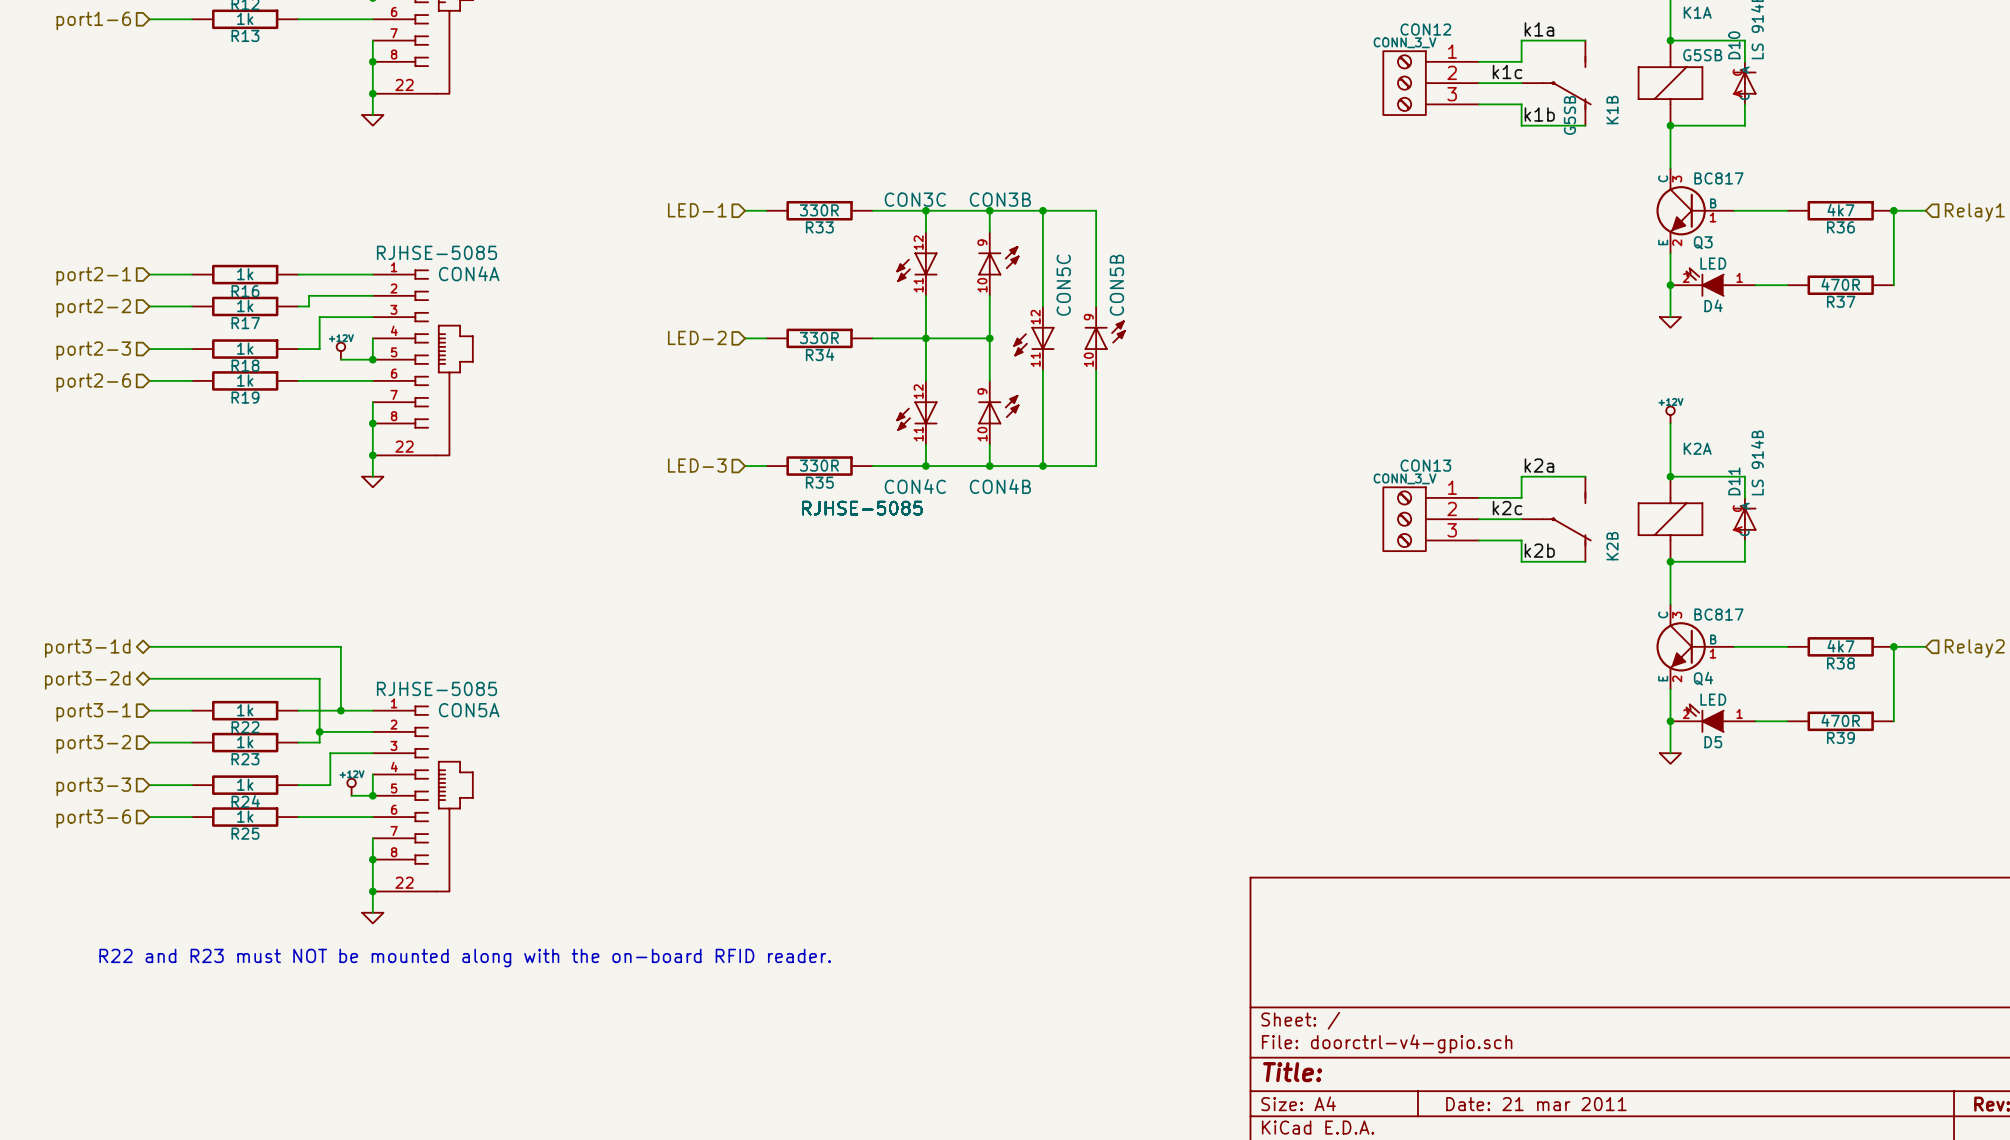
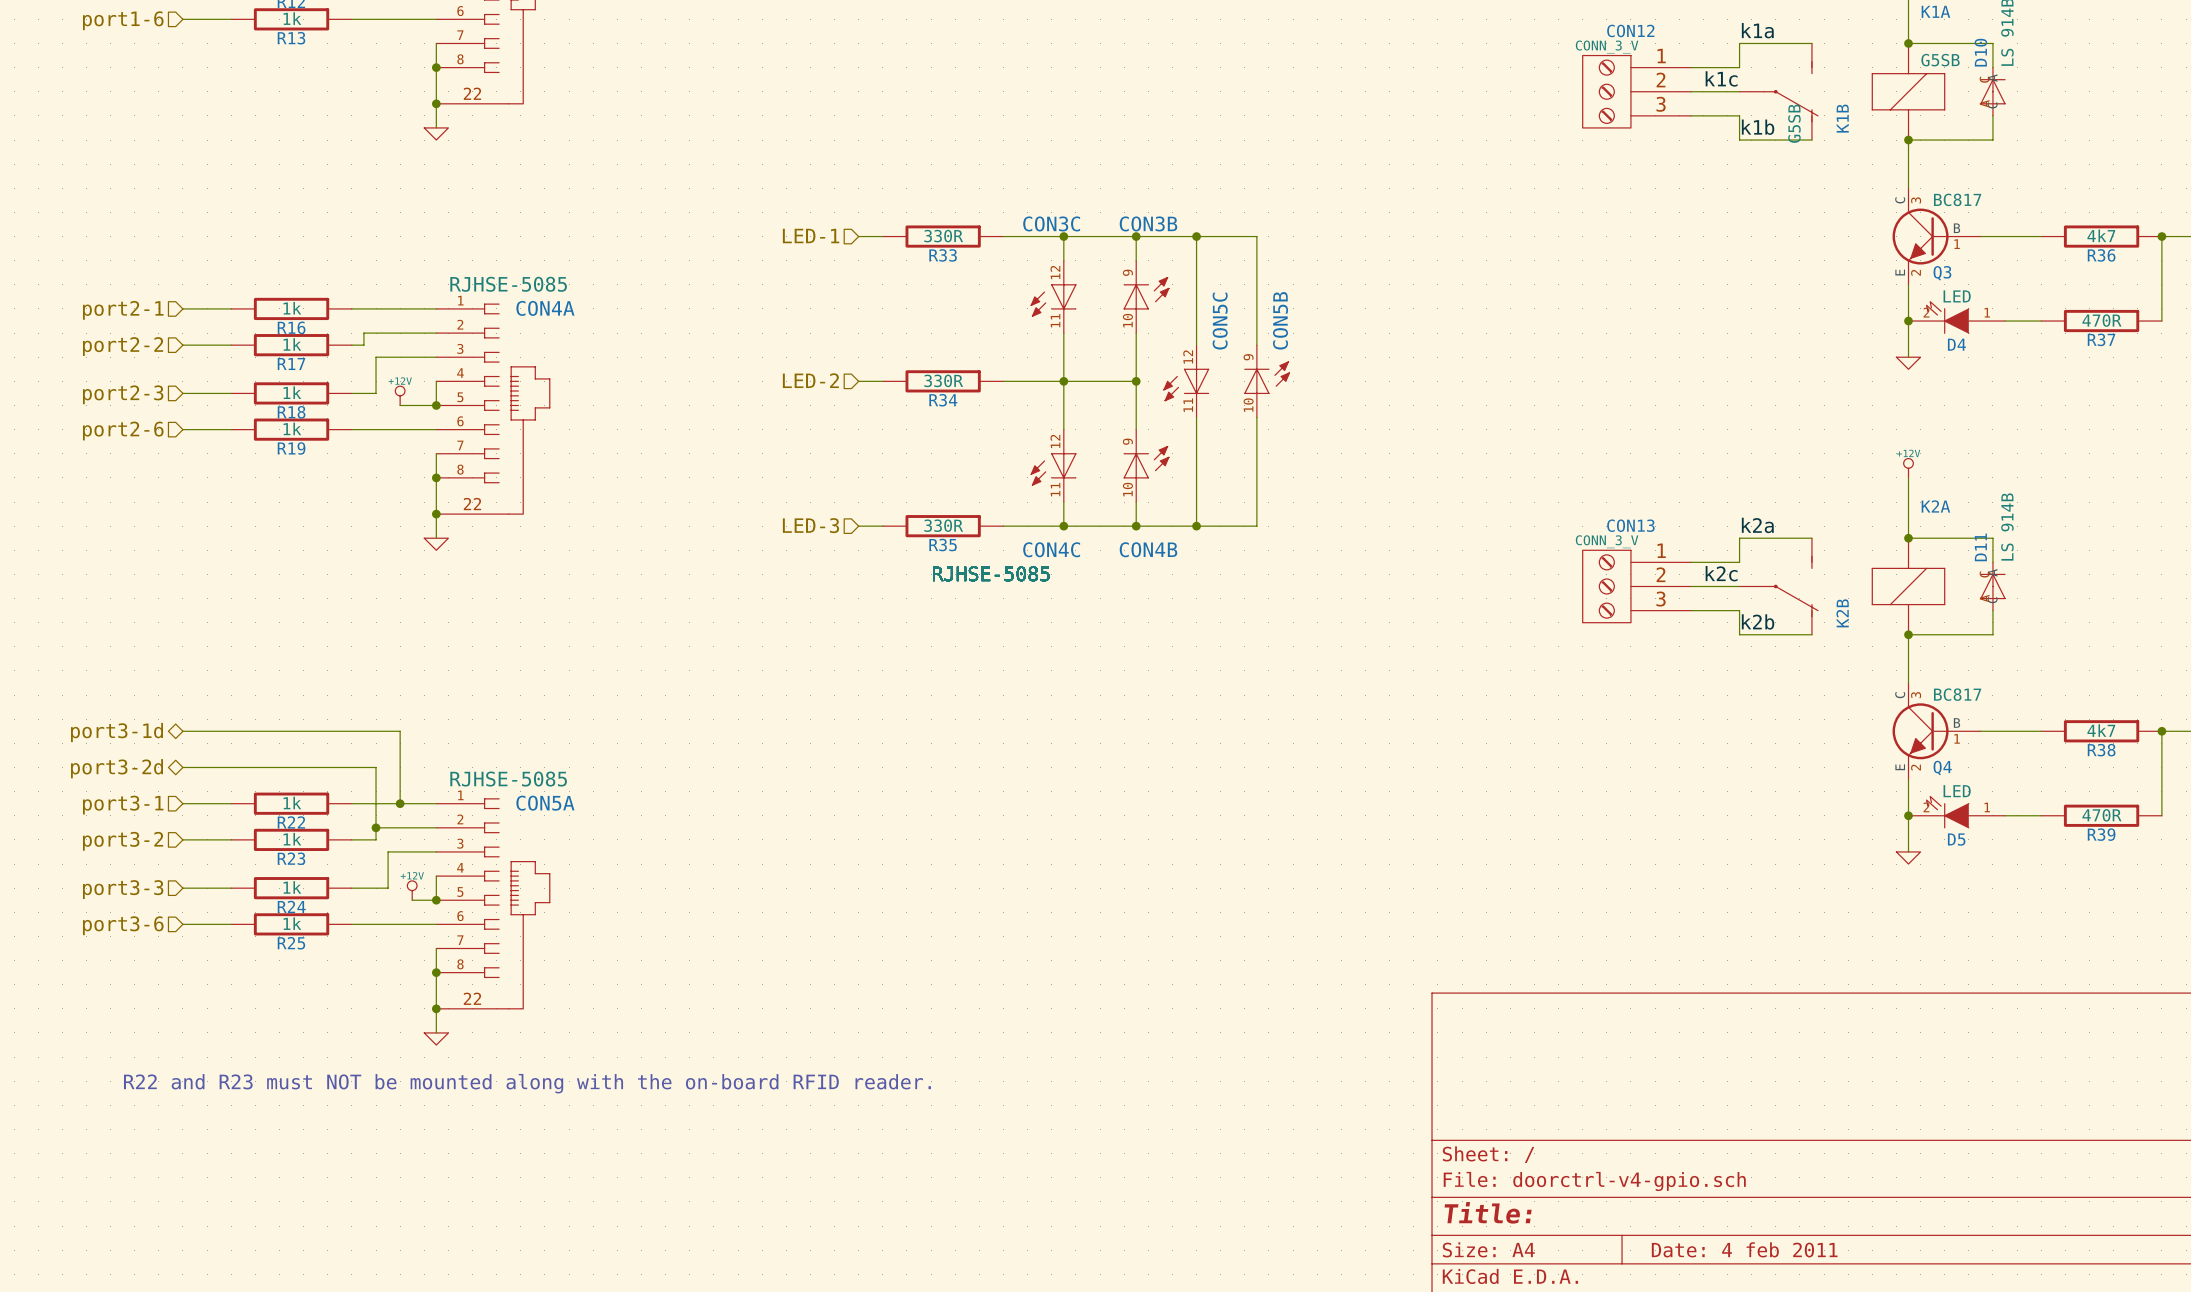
title block: Date: 21 mar 2011 (1536, 1104) -> Date: 4 feb 2011 (1744, 1249)

